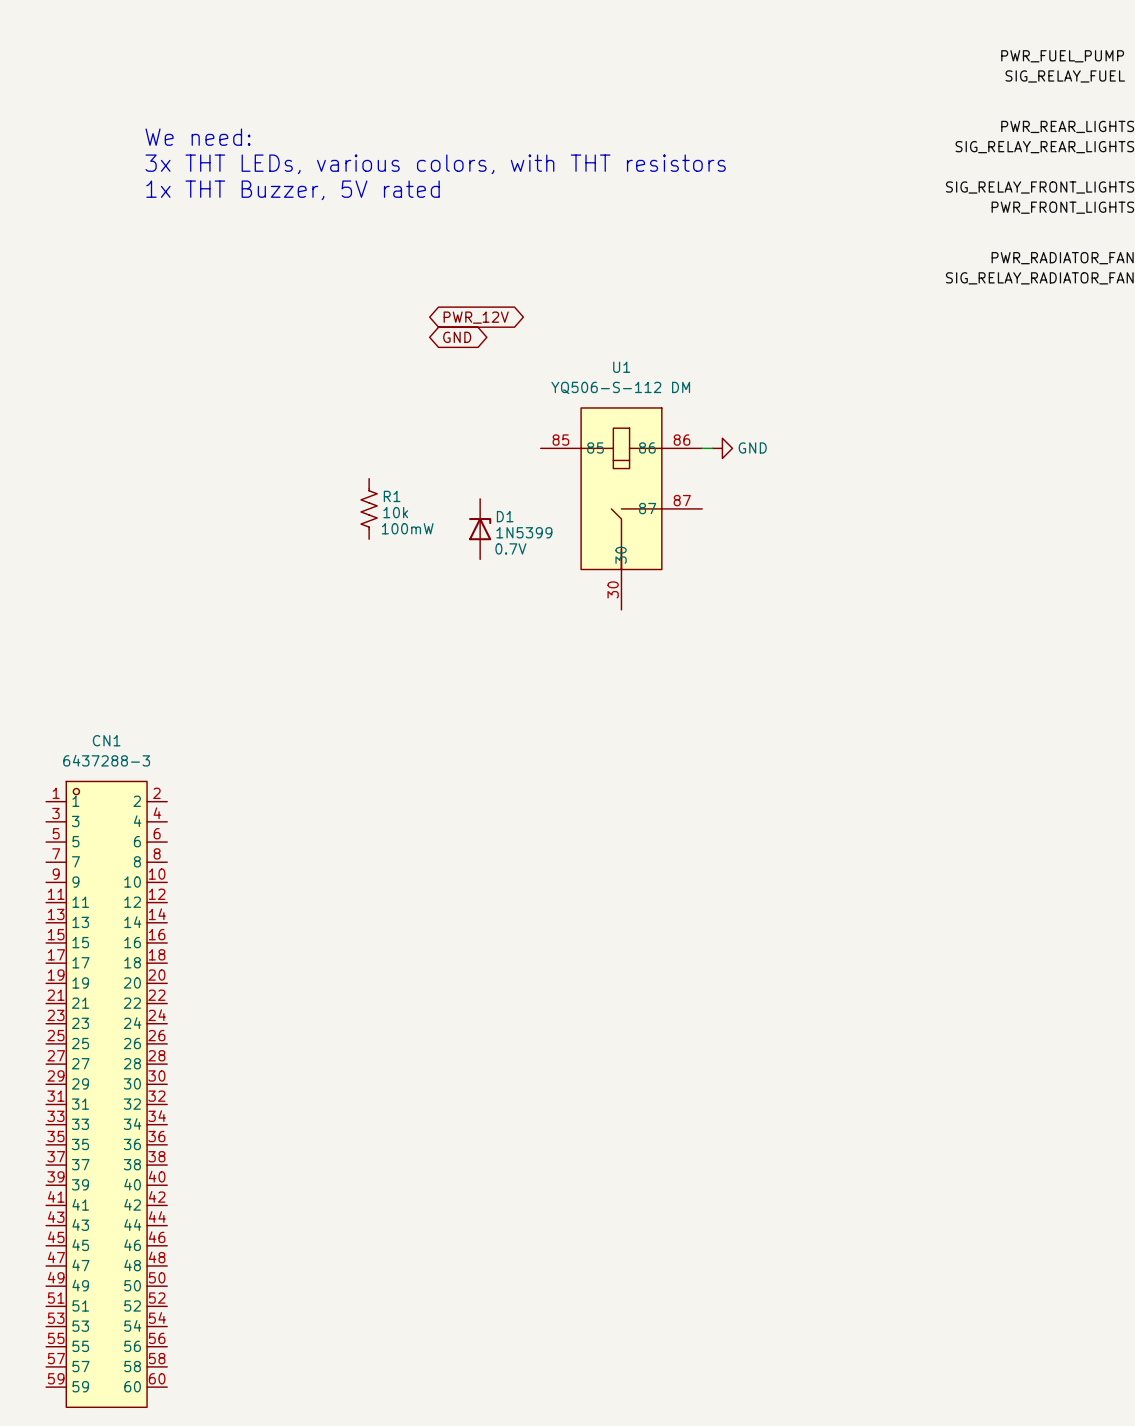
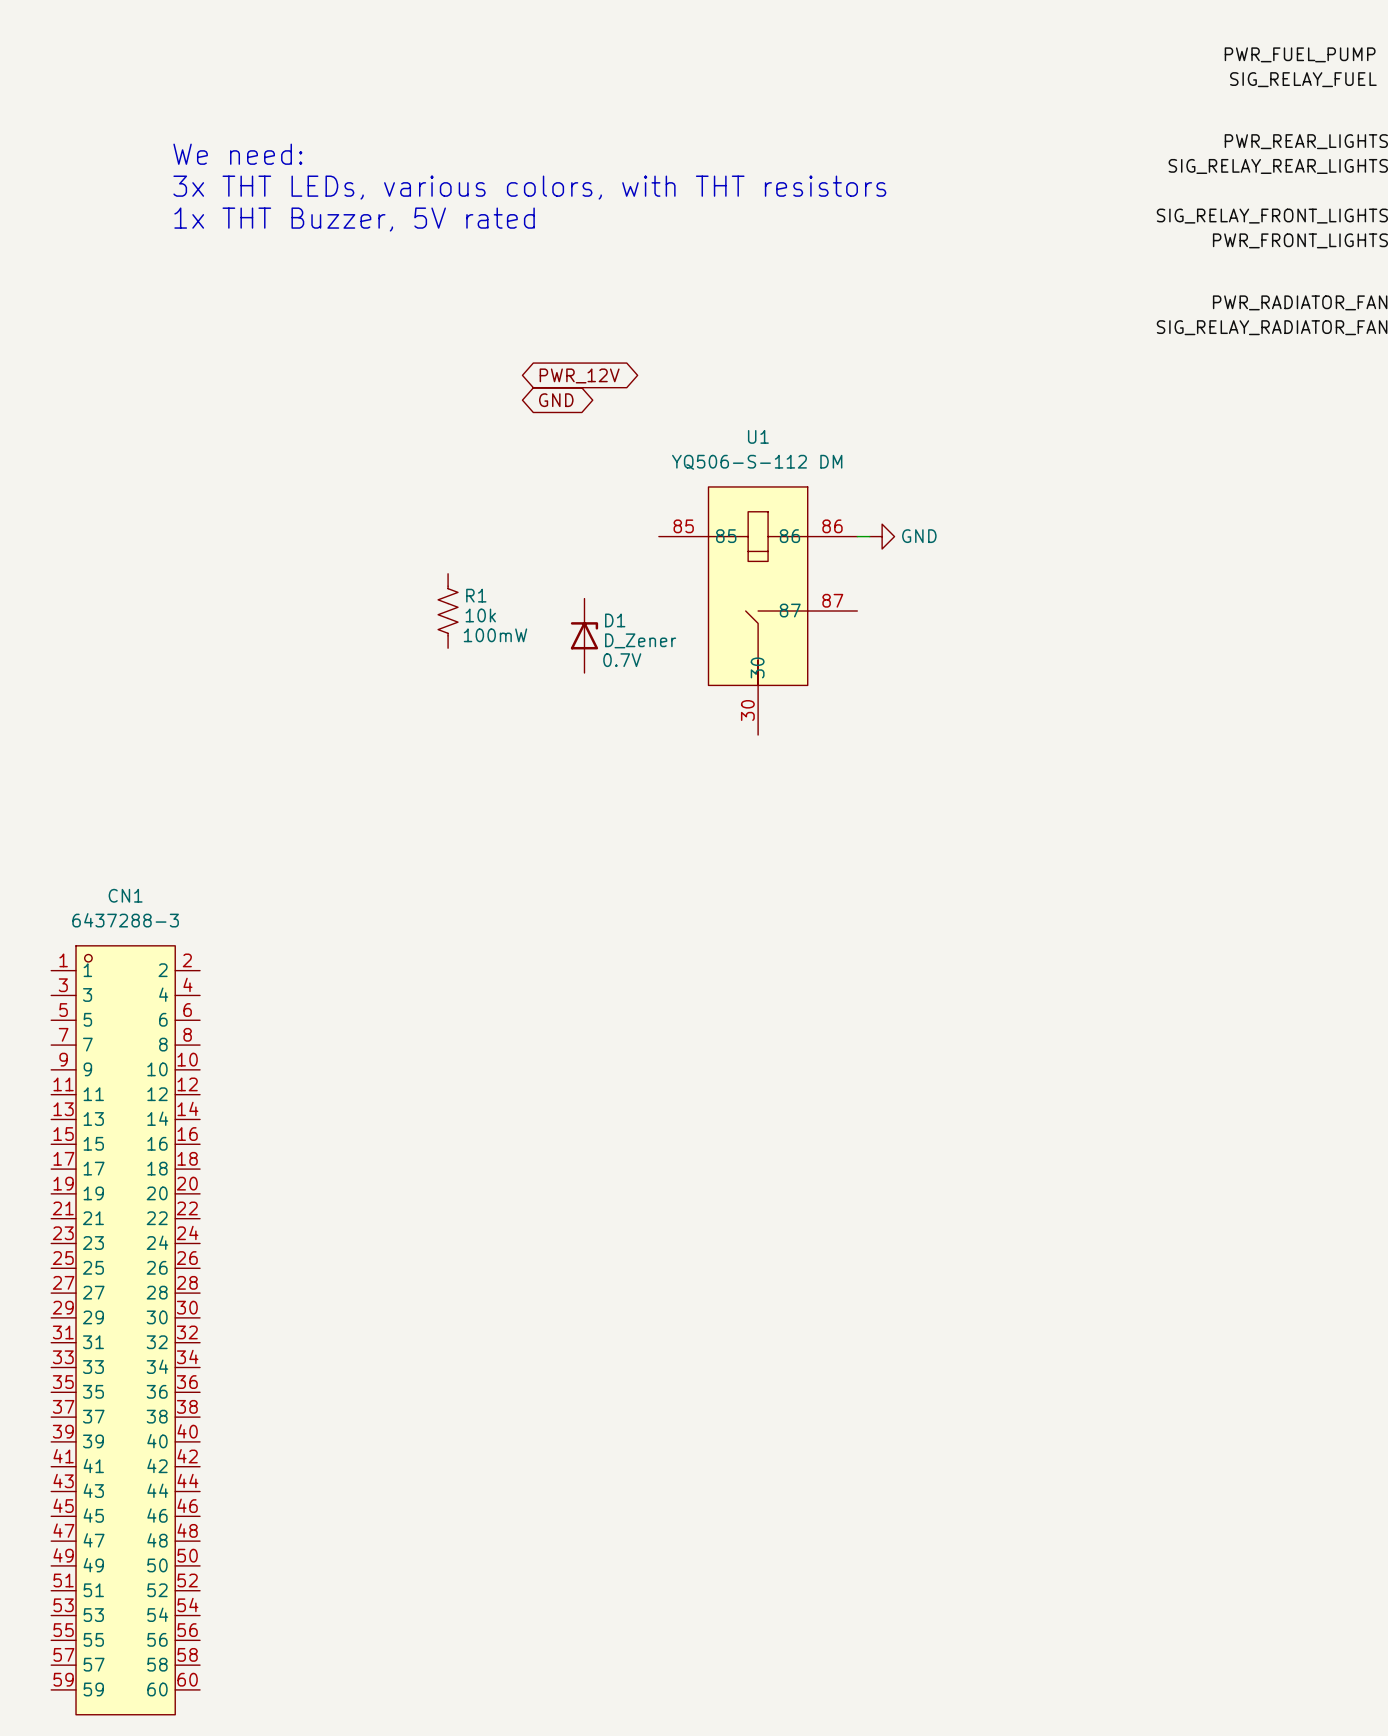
D1 value: 1N5399 (524, 532) -> D_Zener (640, 640)

